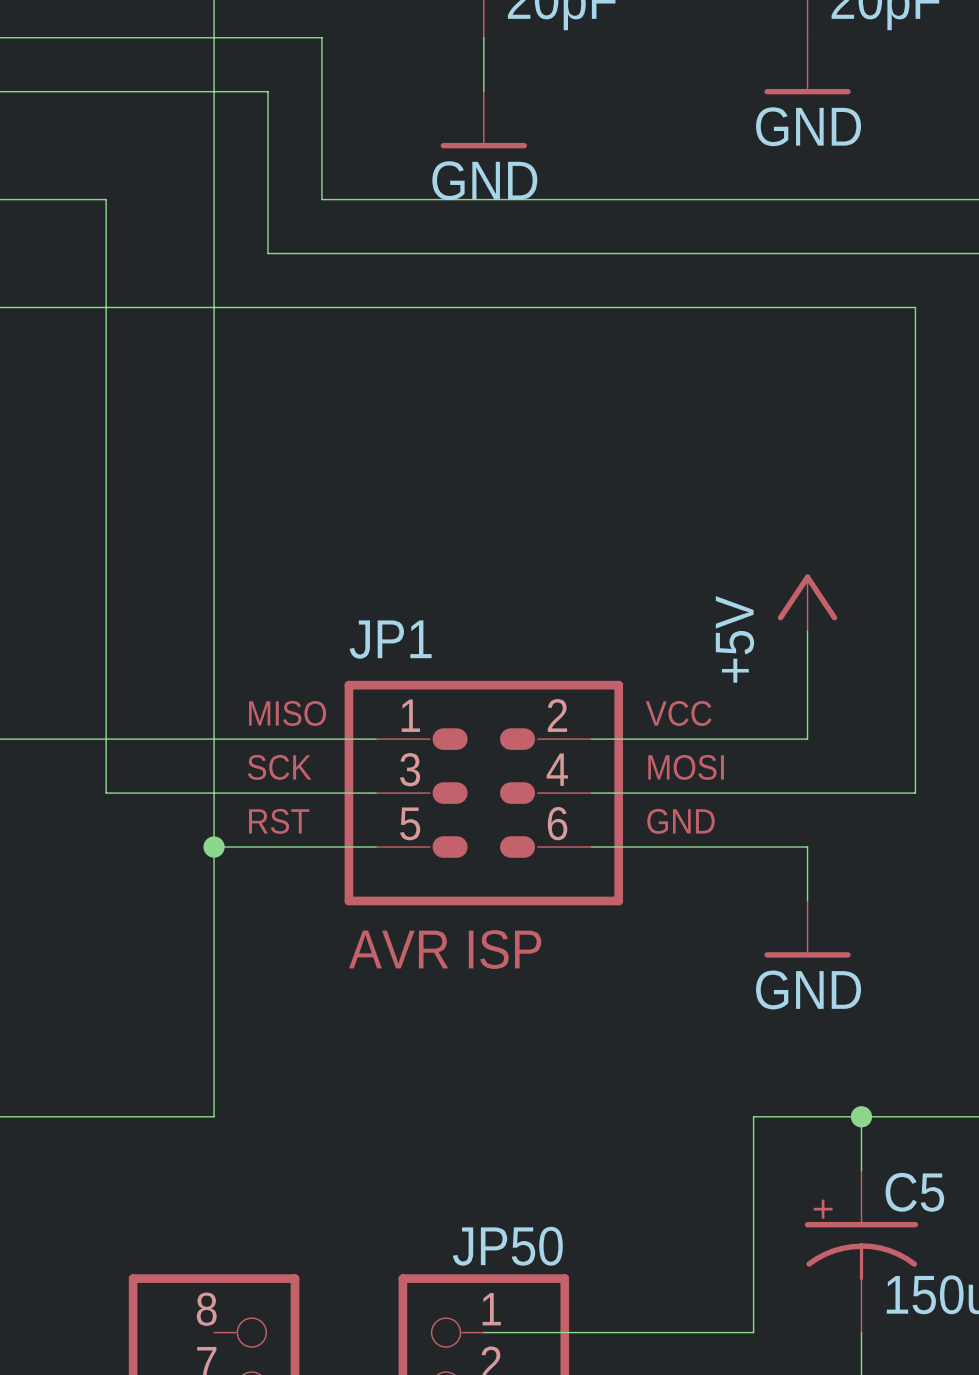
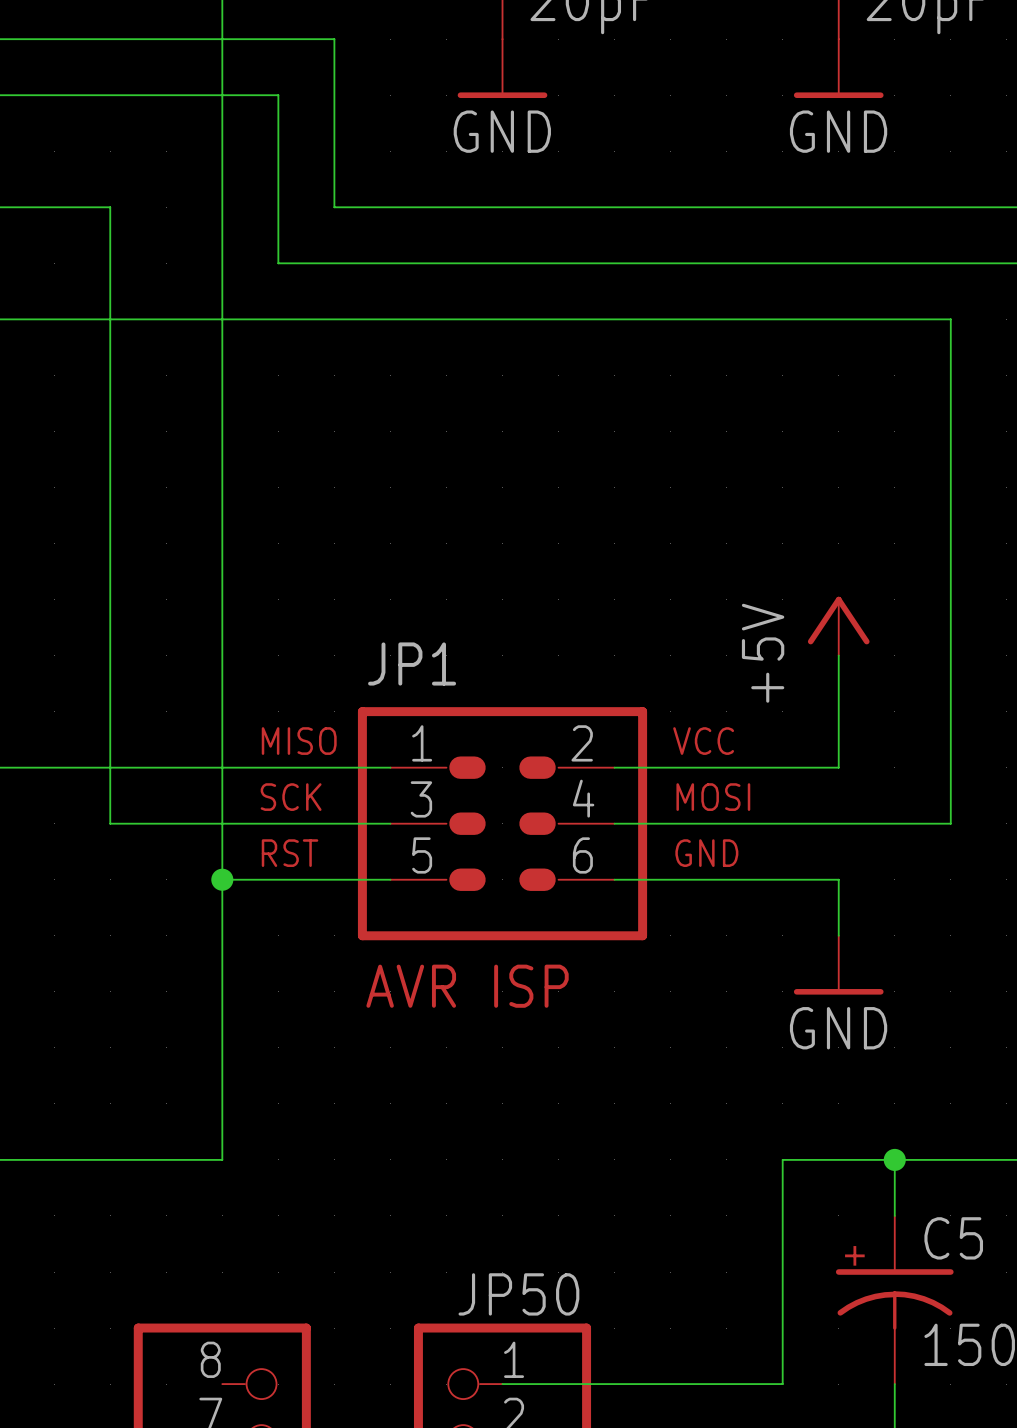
power symbol position: GND (483, 120) -> GND (502, 68)

